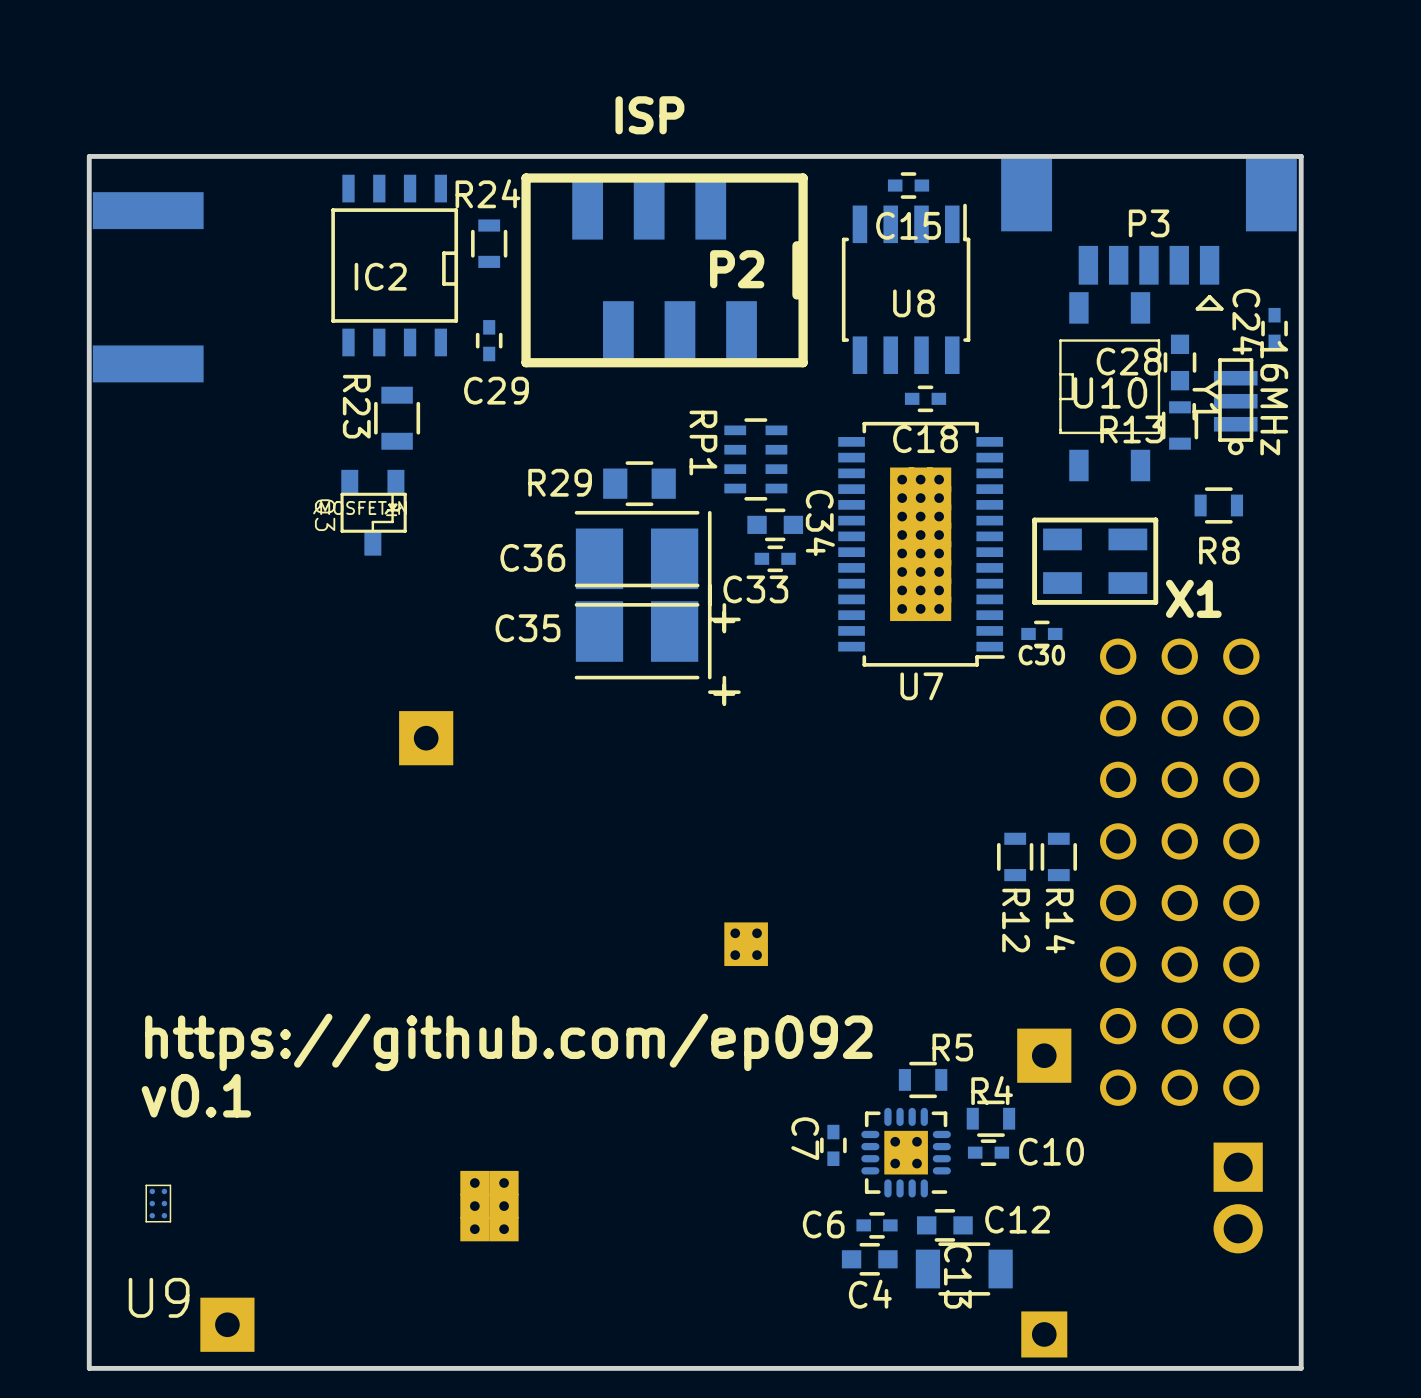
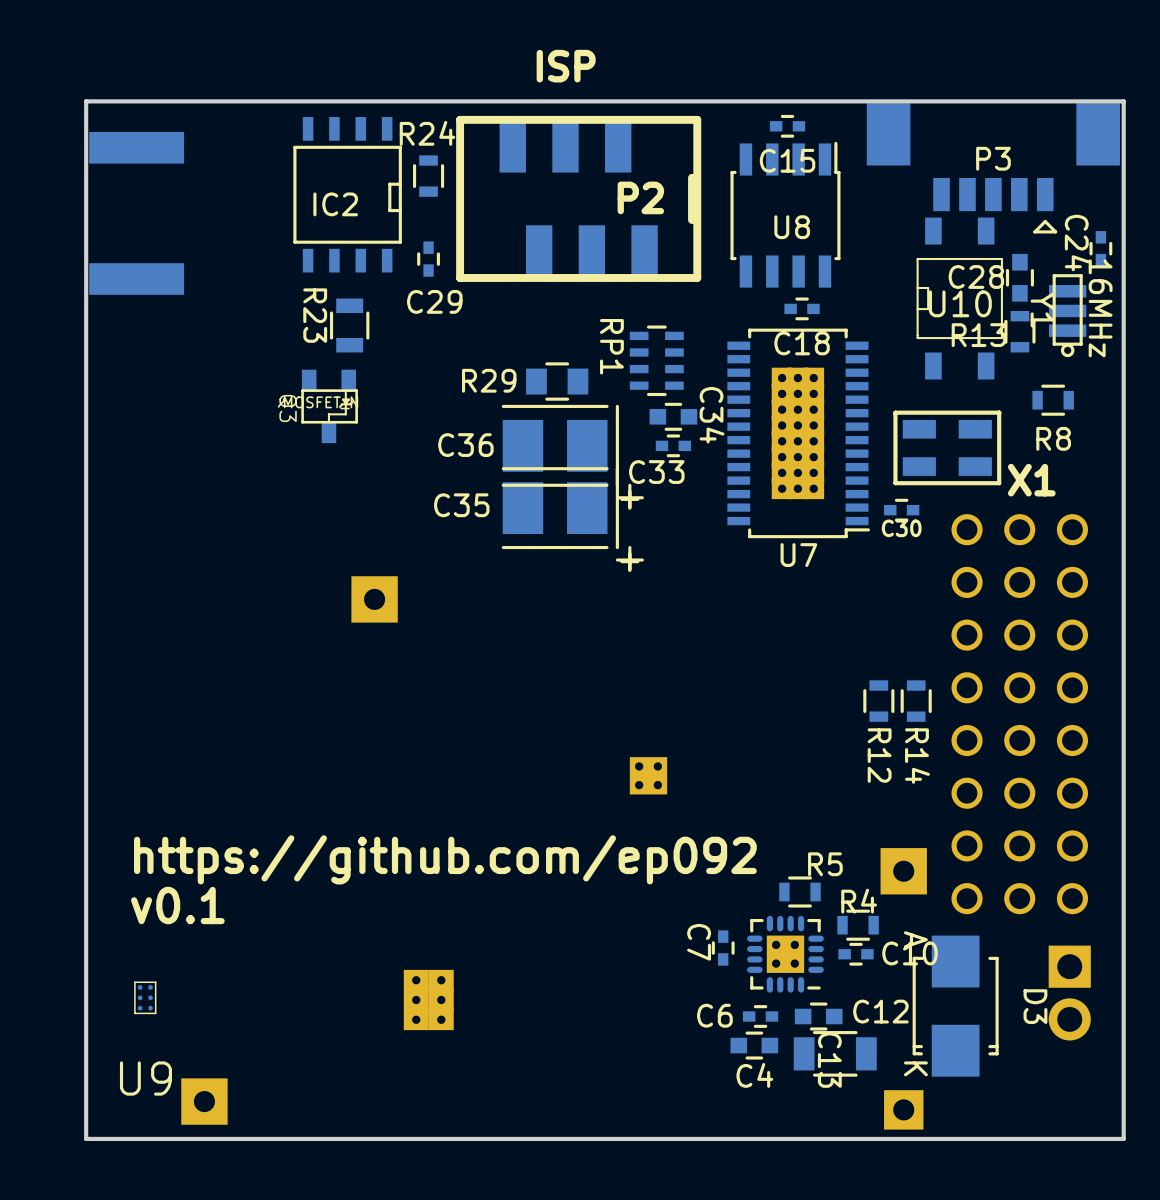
D3: none -> (955, 1006)

